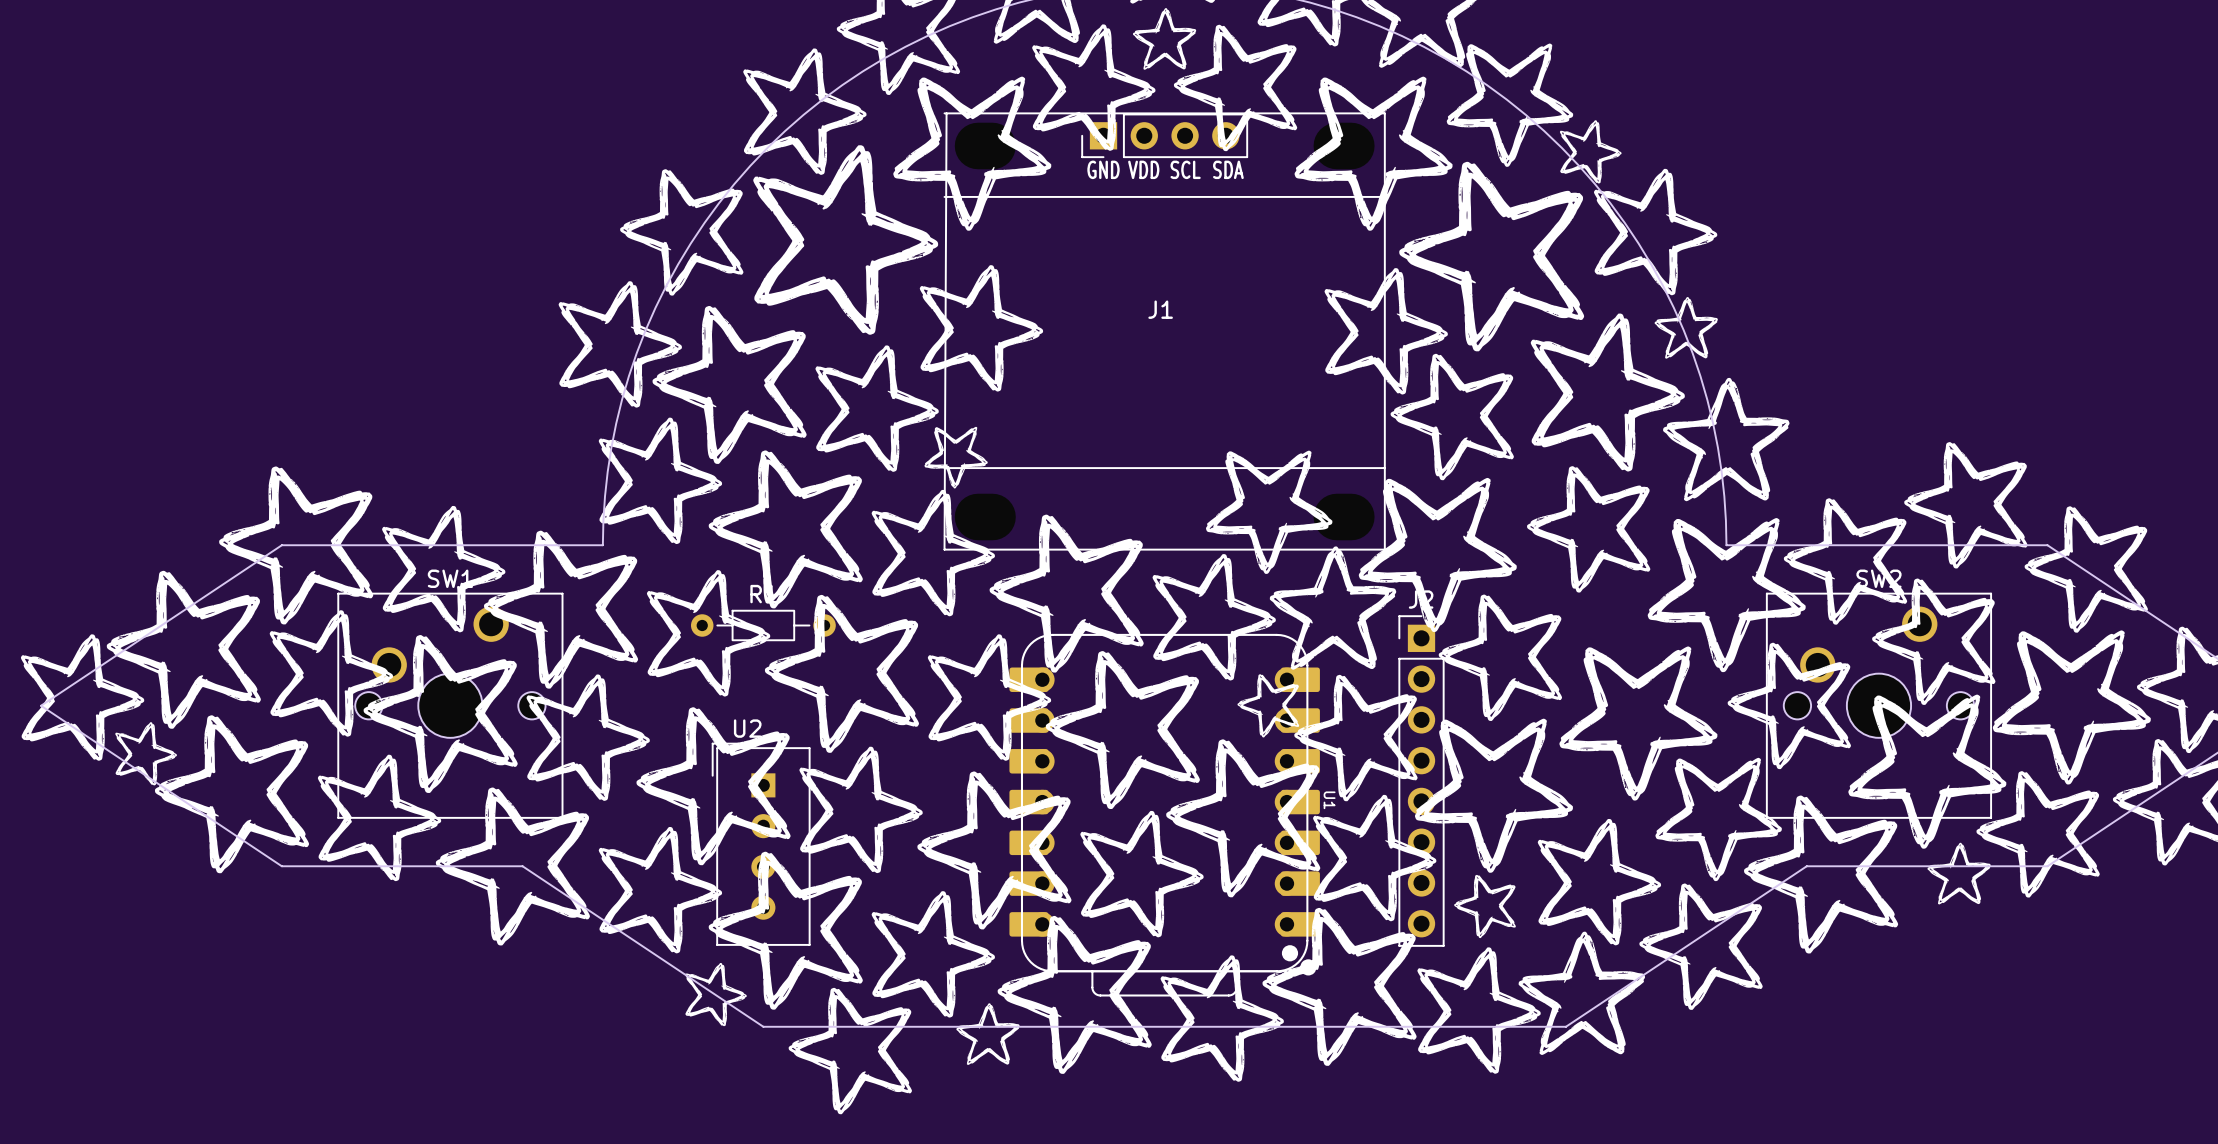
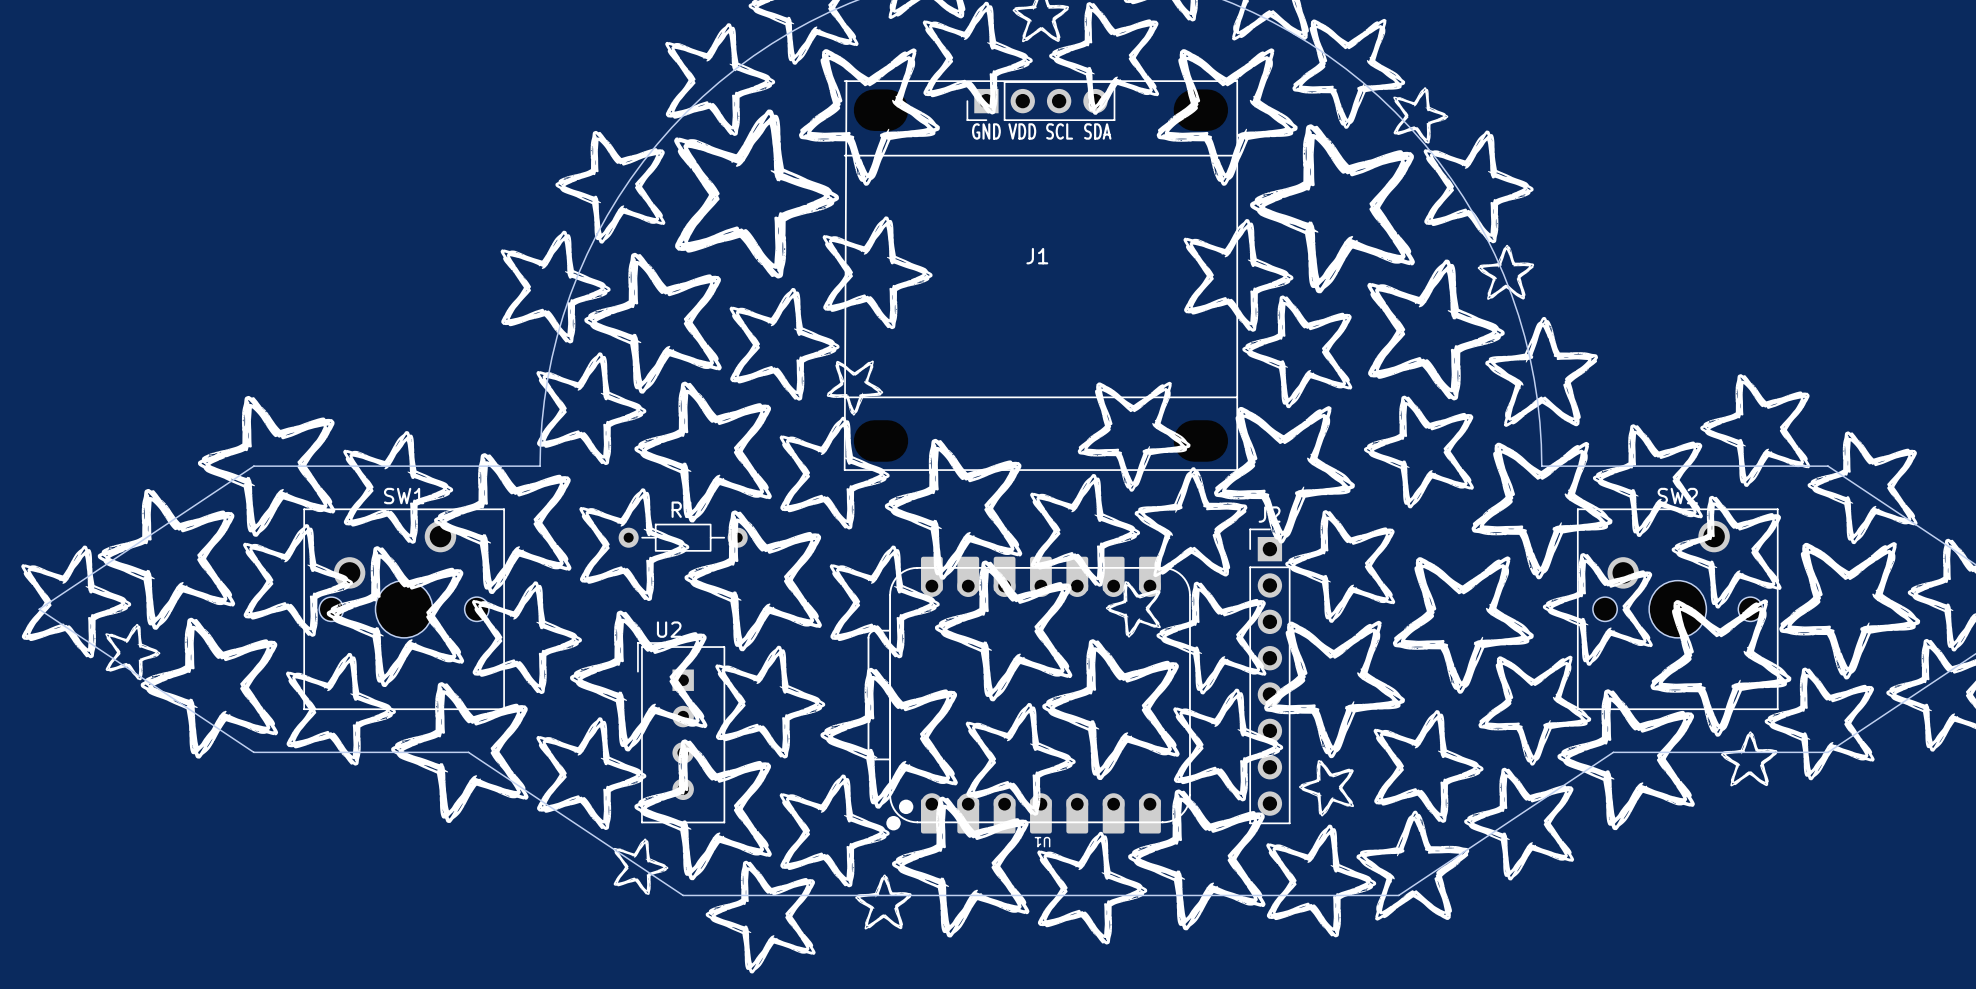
U1 rotation: 0° (1164, 815) -> 90° clockwise (1029, 695)

